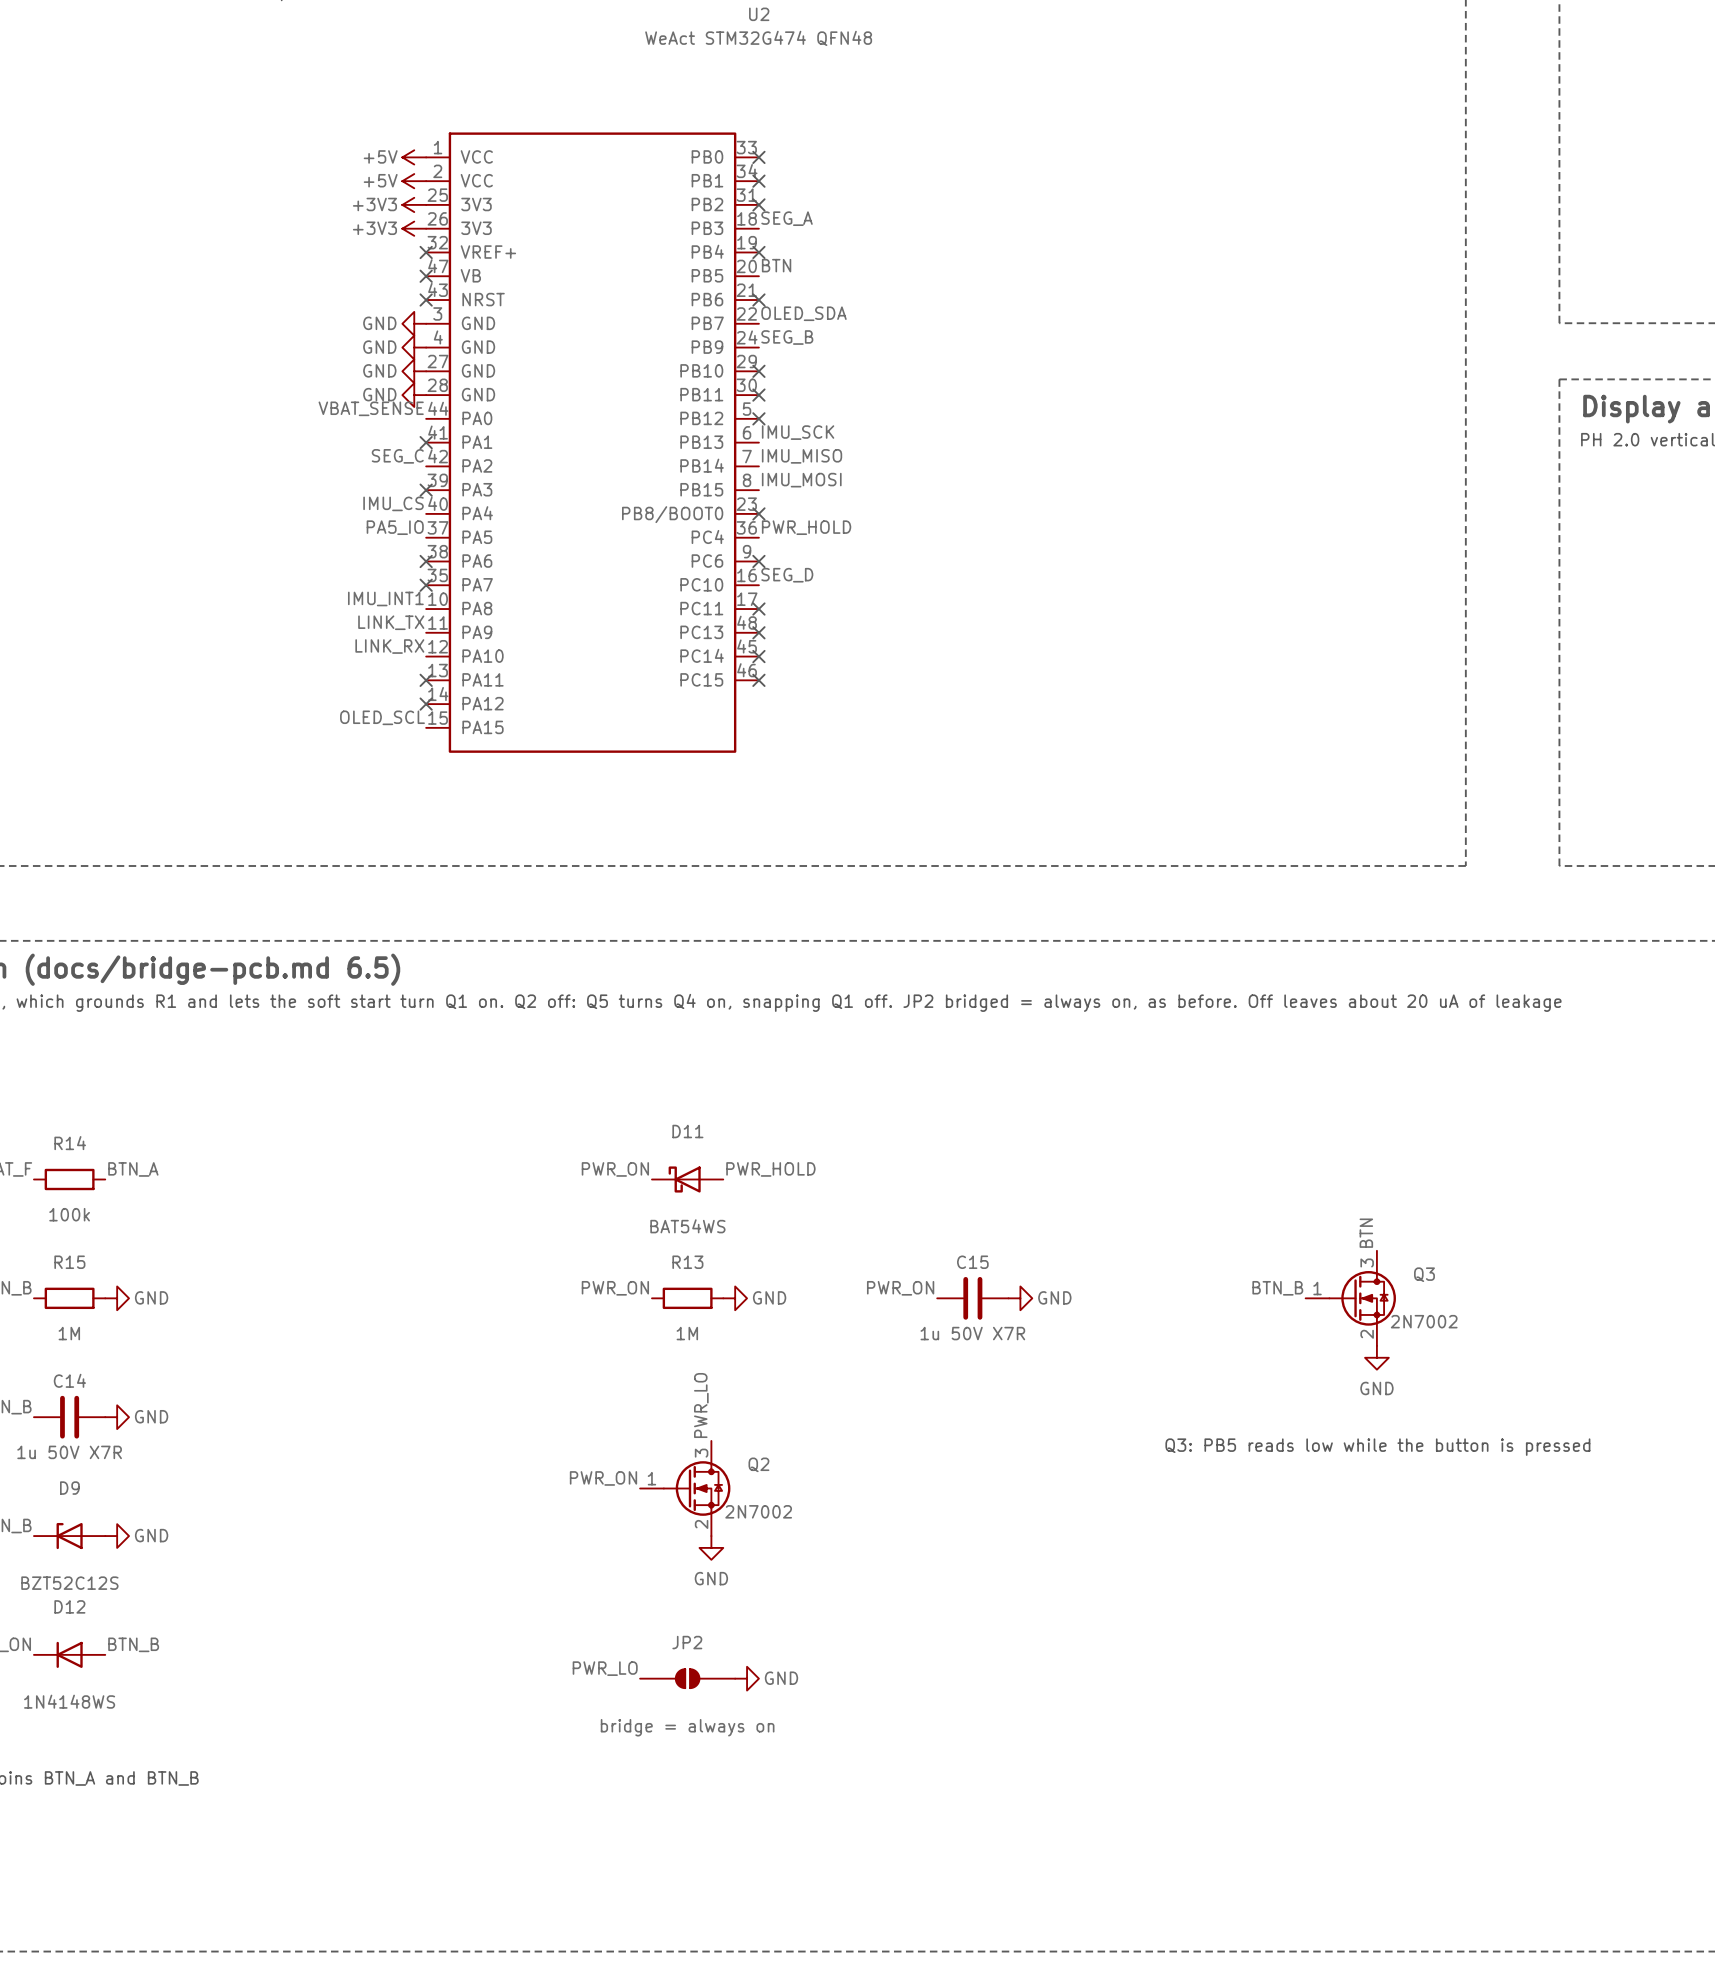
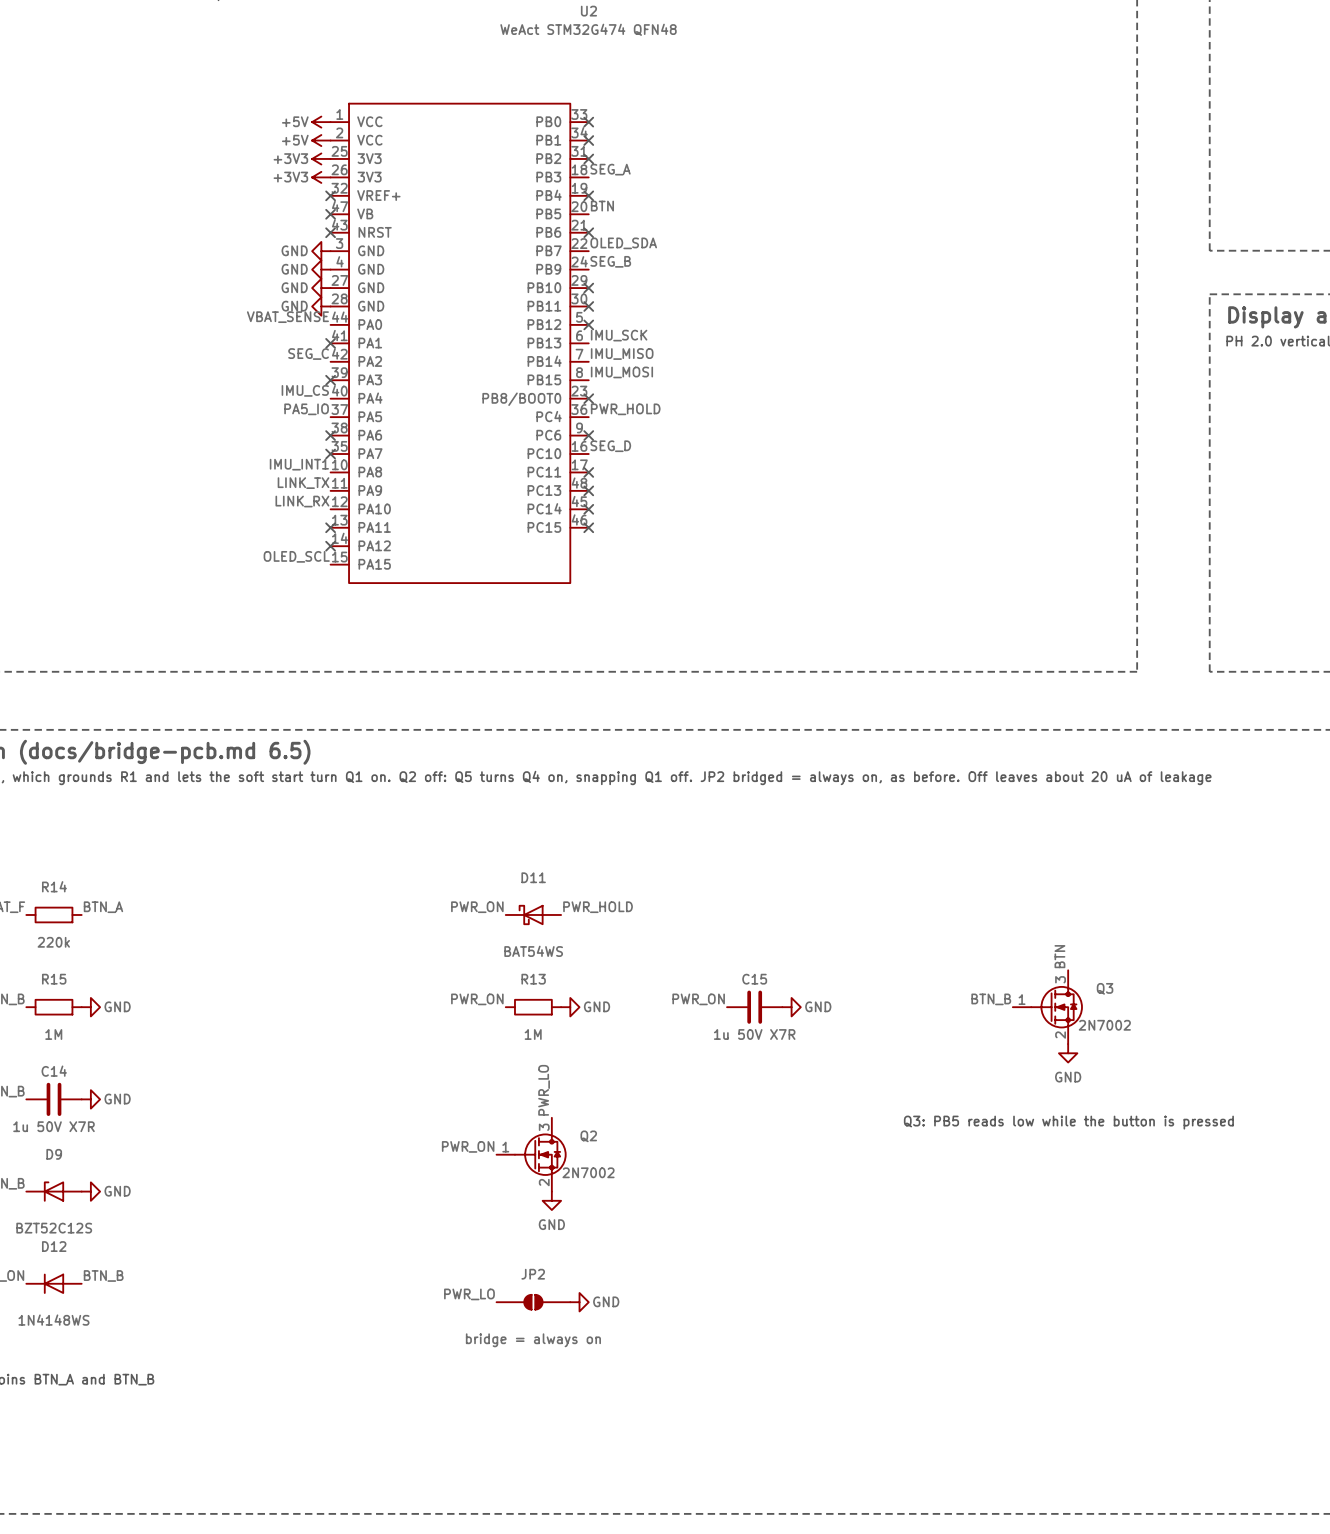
R14 value: 100k (69, 1214) -> 220k (53, 942)

